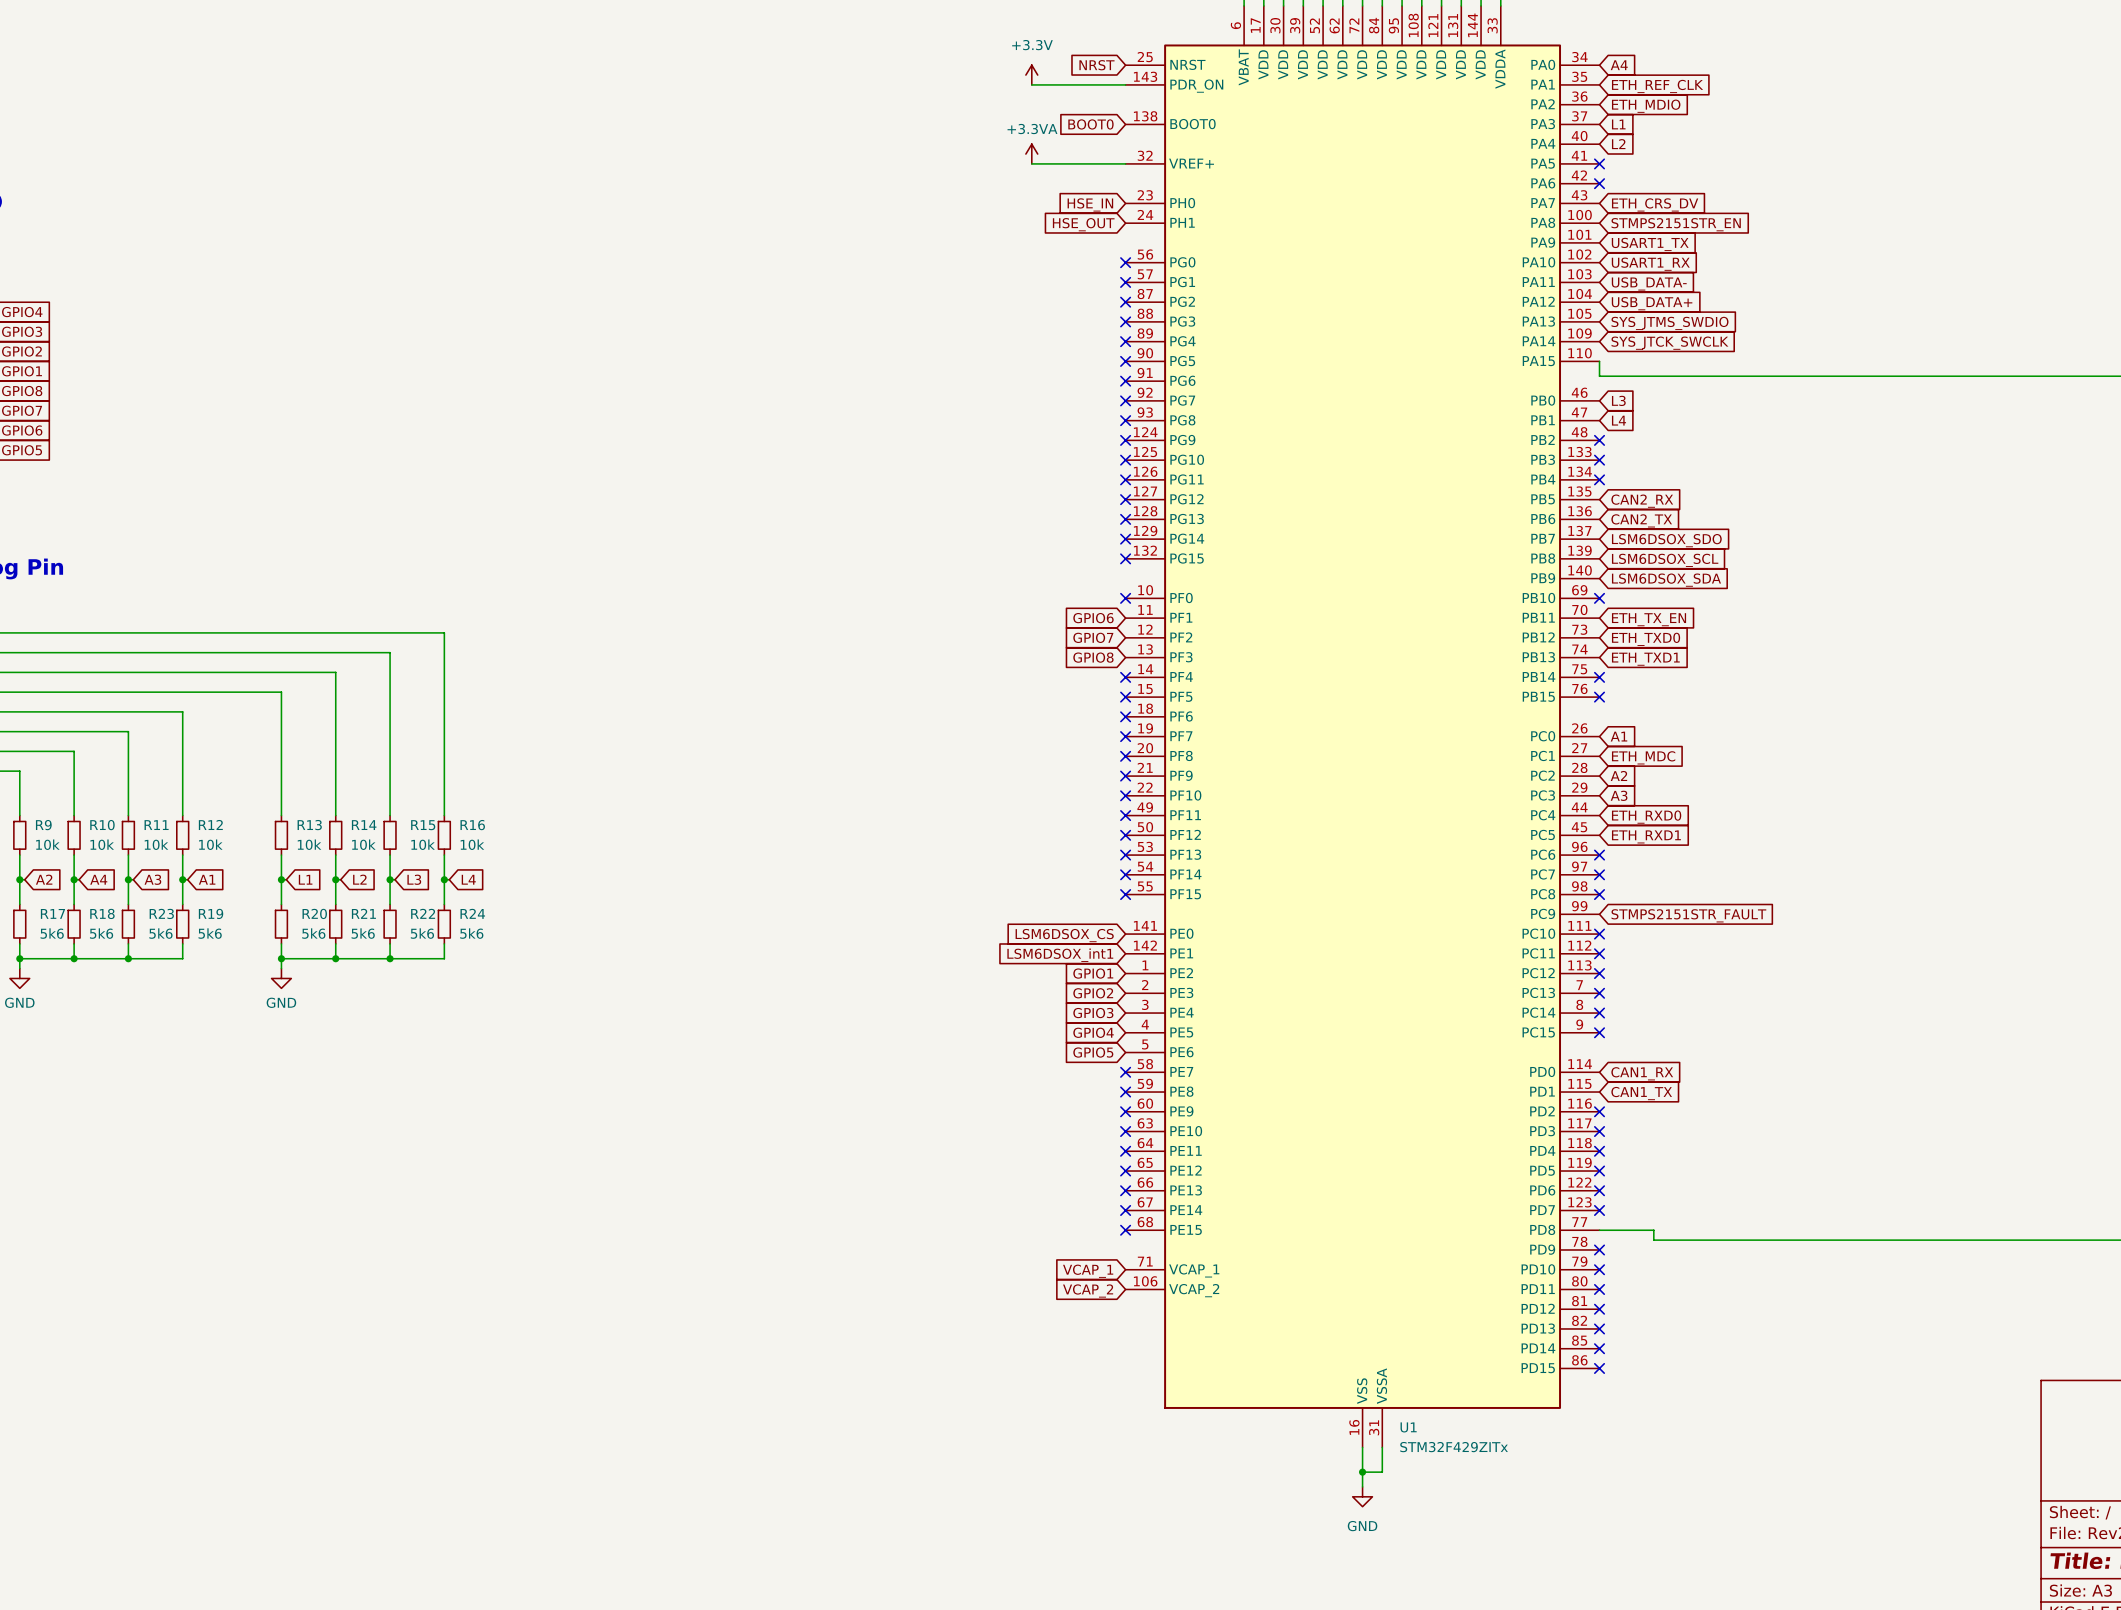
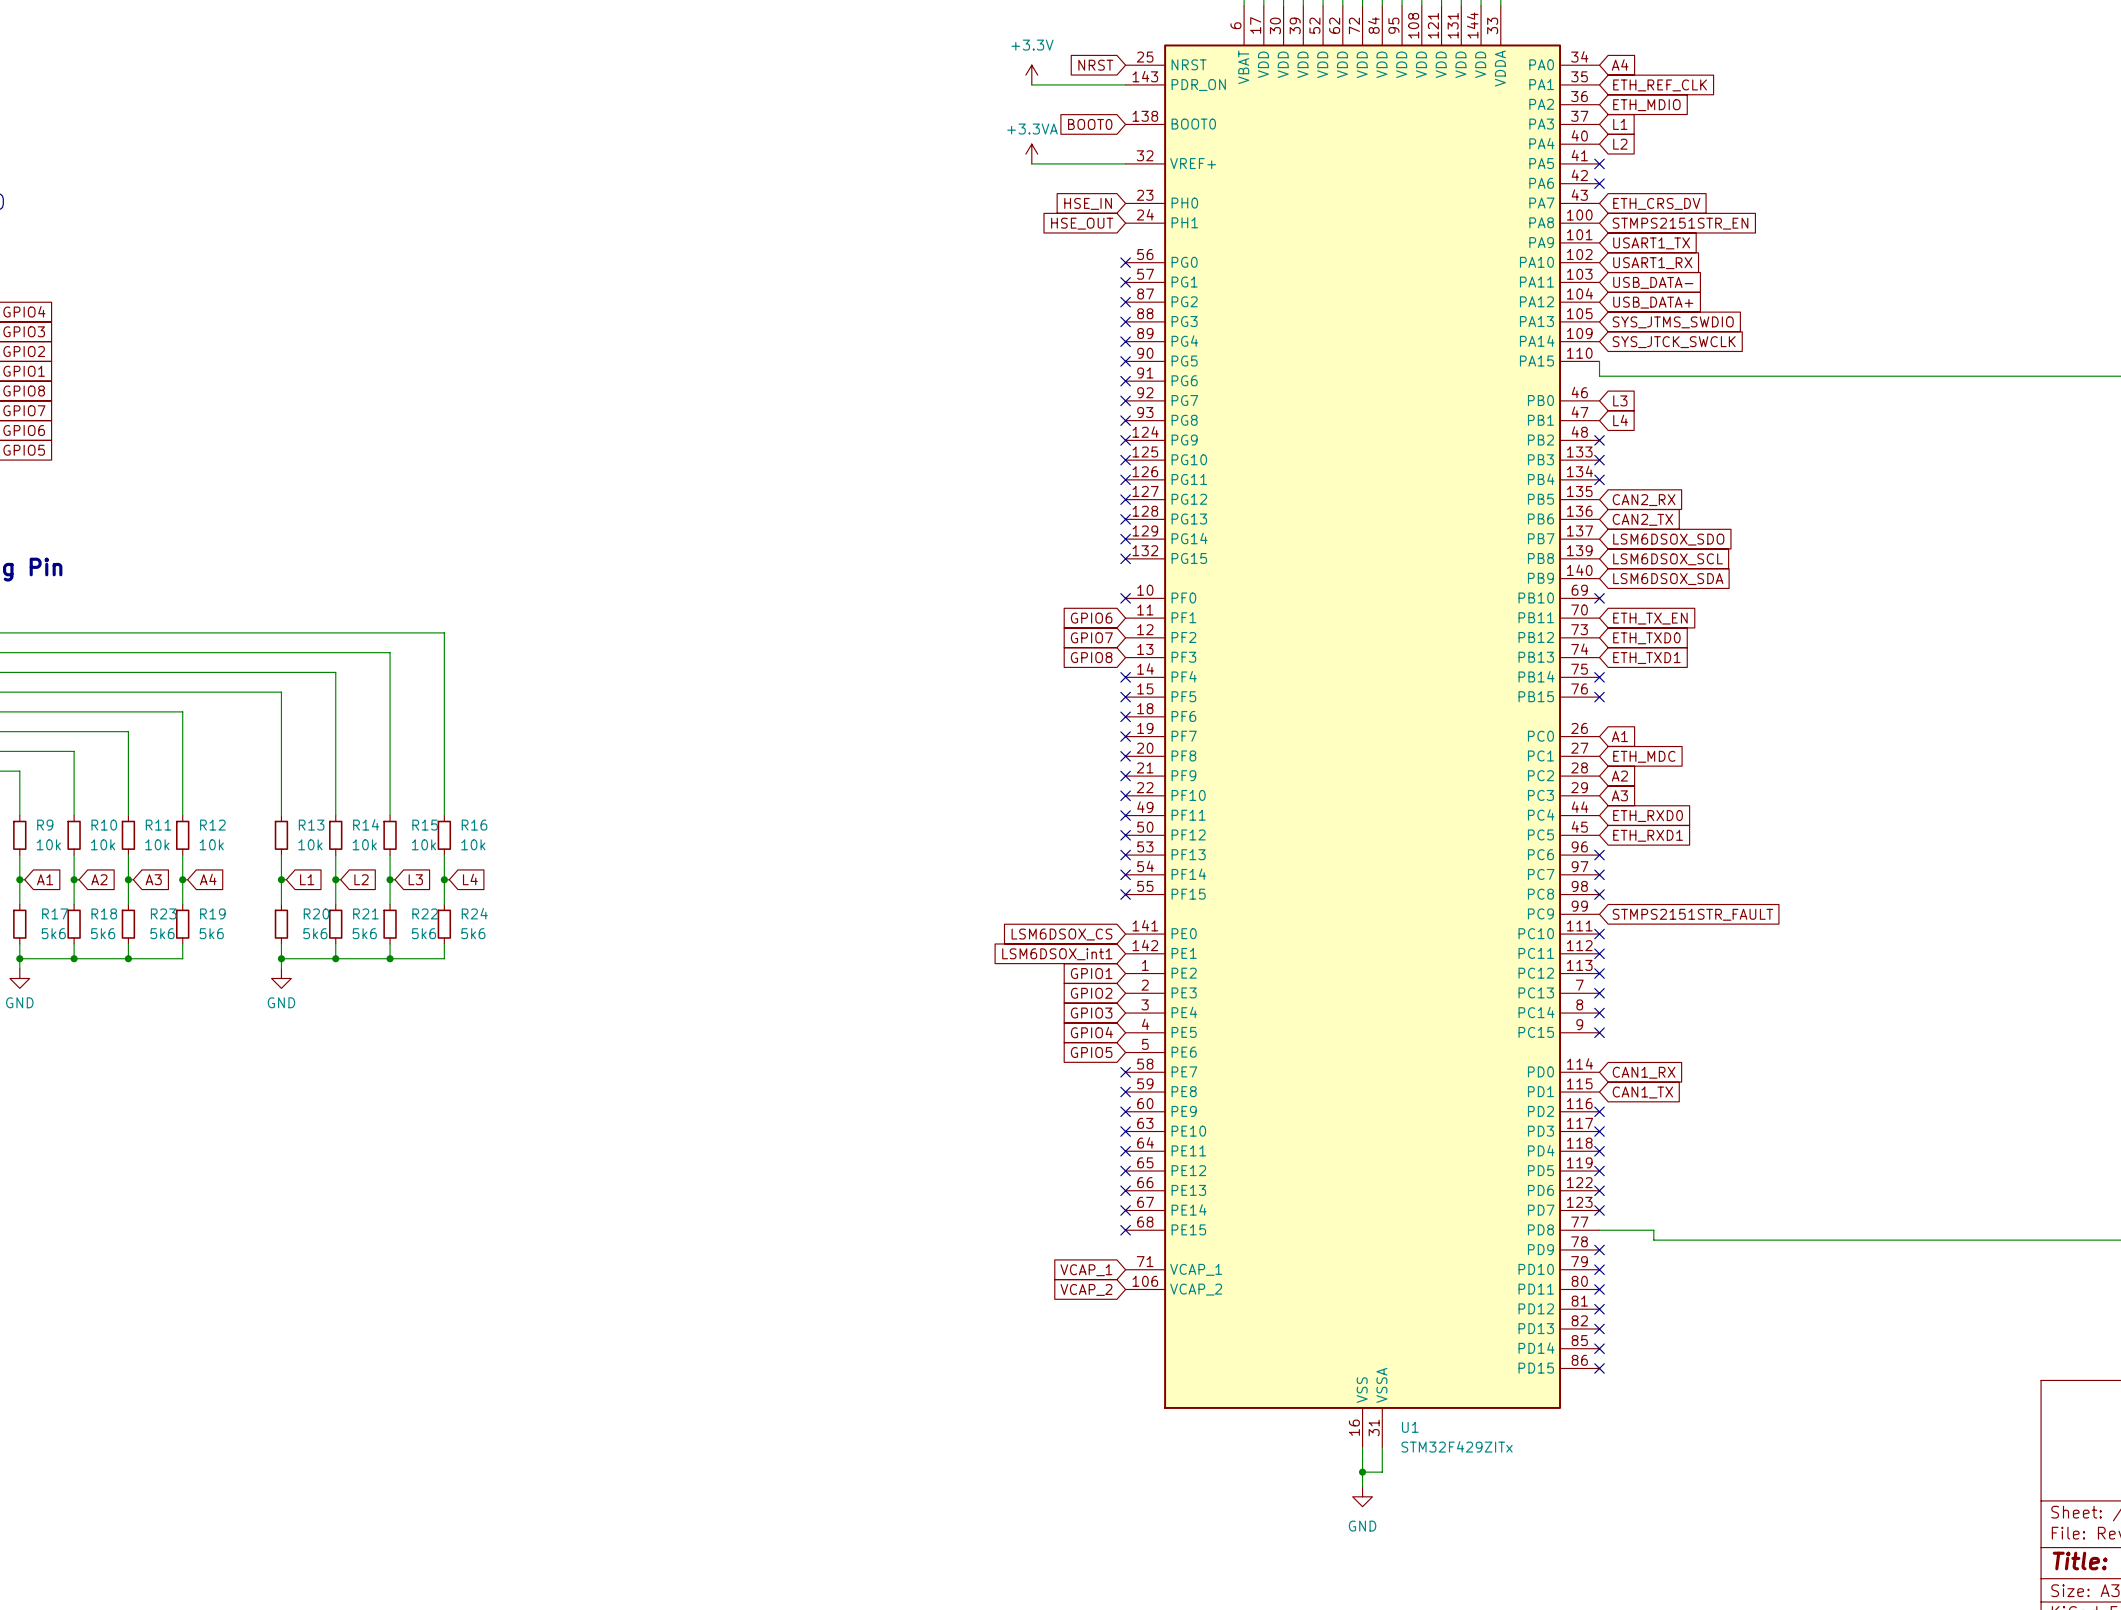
global label: A2 (44, 879) -> A1 (45, 879)
global label: A4 (98, 879) -> A2 (99, 879)
global label: A1 (207, 879) -> A4 (208, 879)

